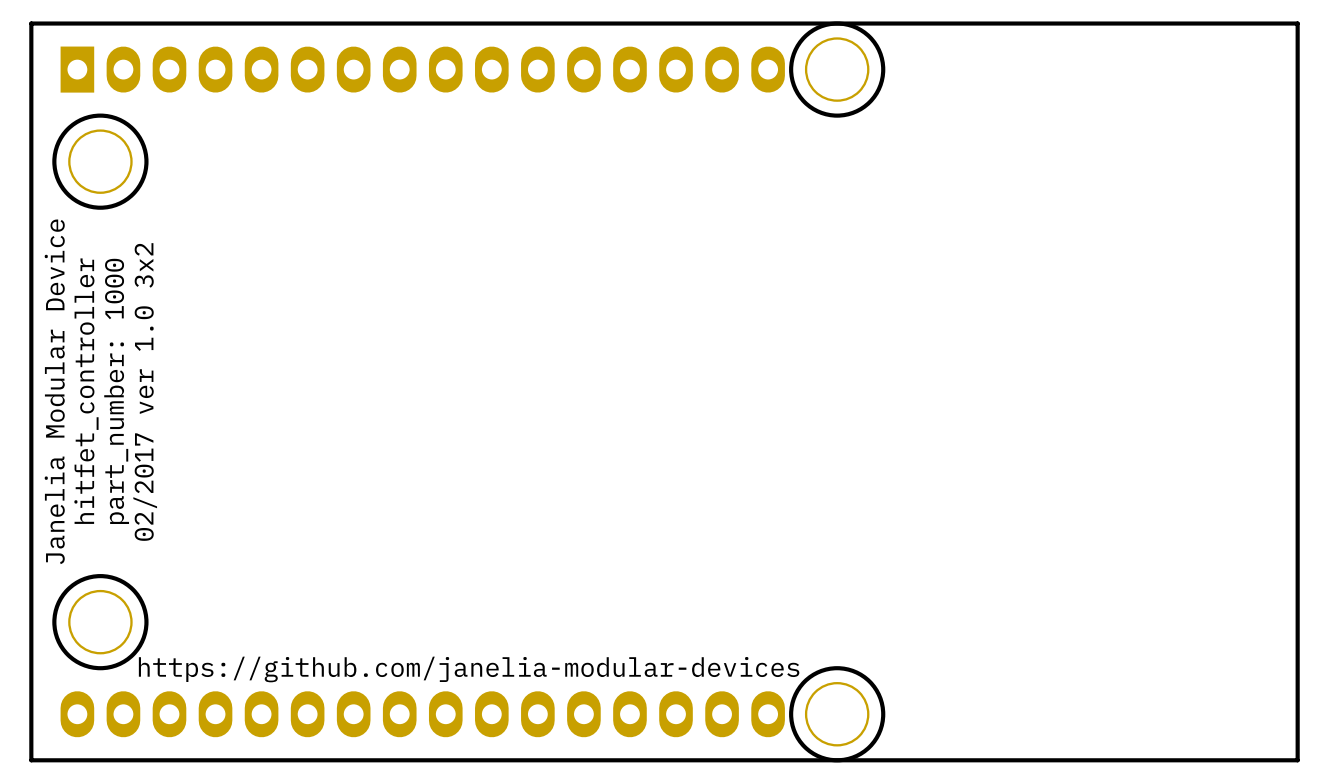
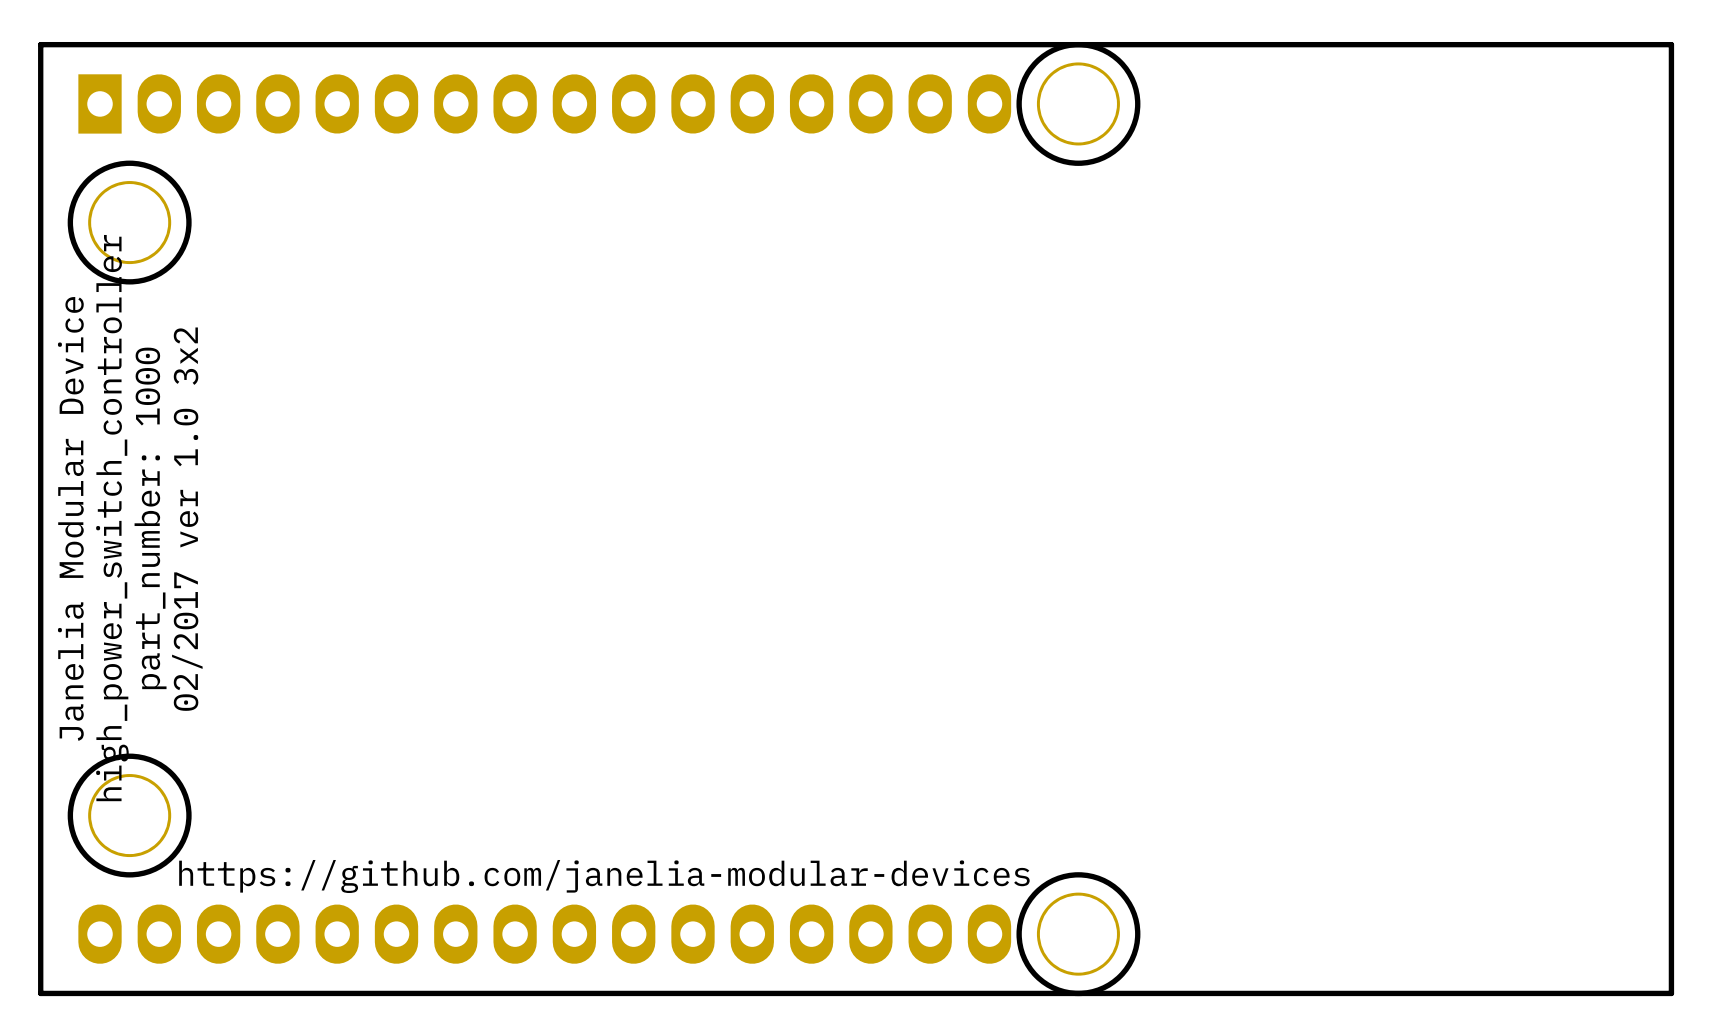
text: hitfet_controller (86, 391) -> high_power_switch_controller (112, 518)

